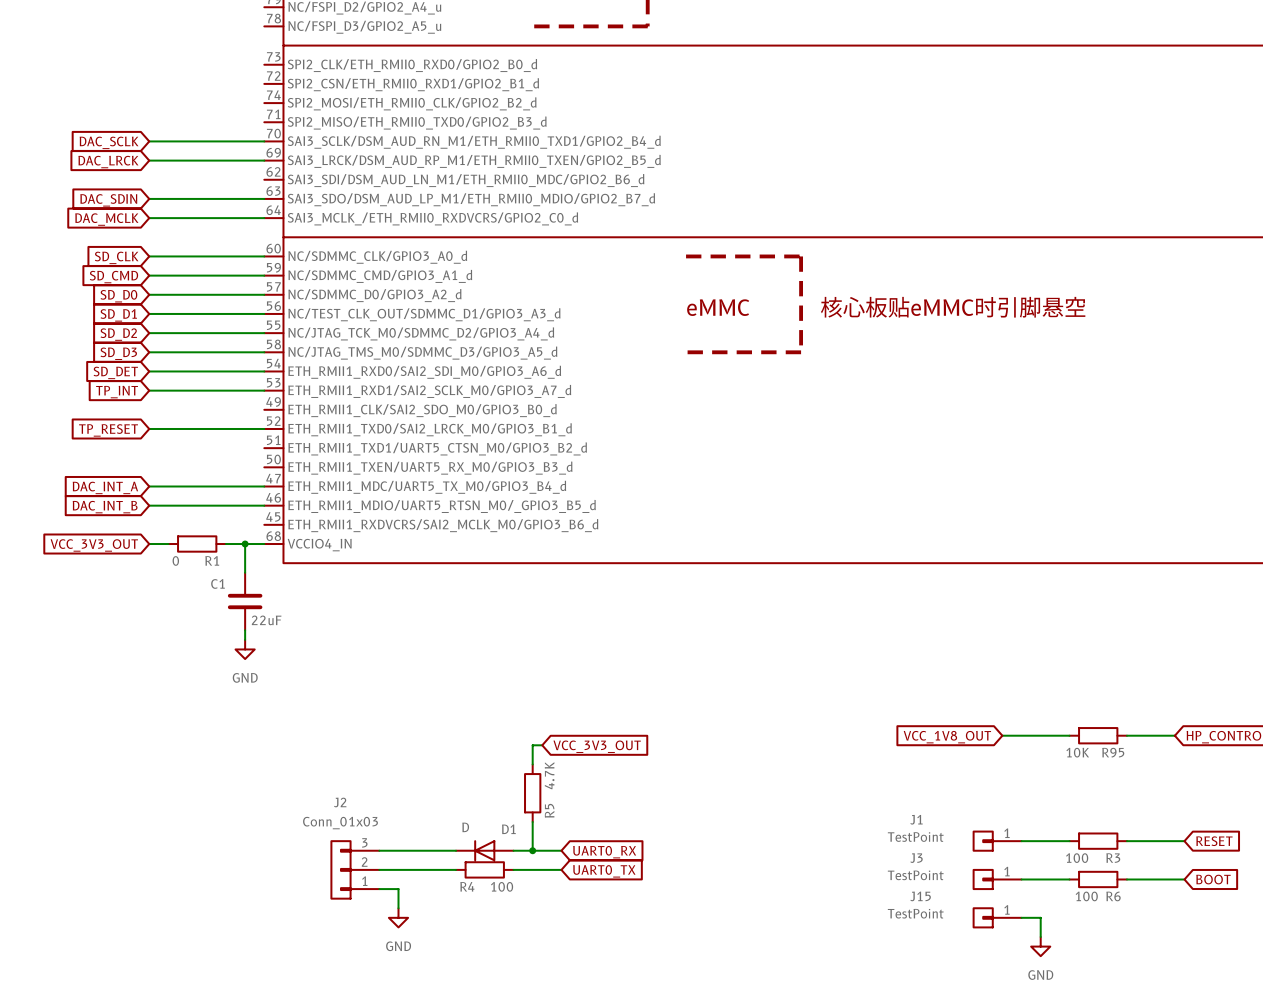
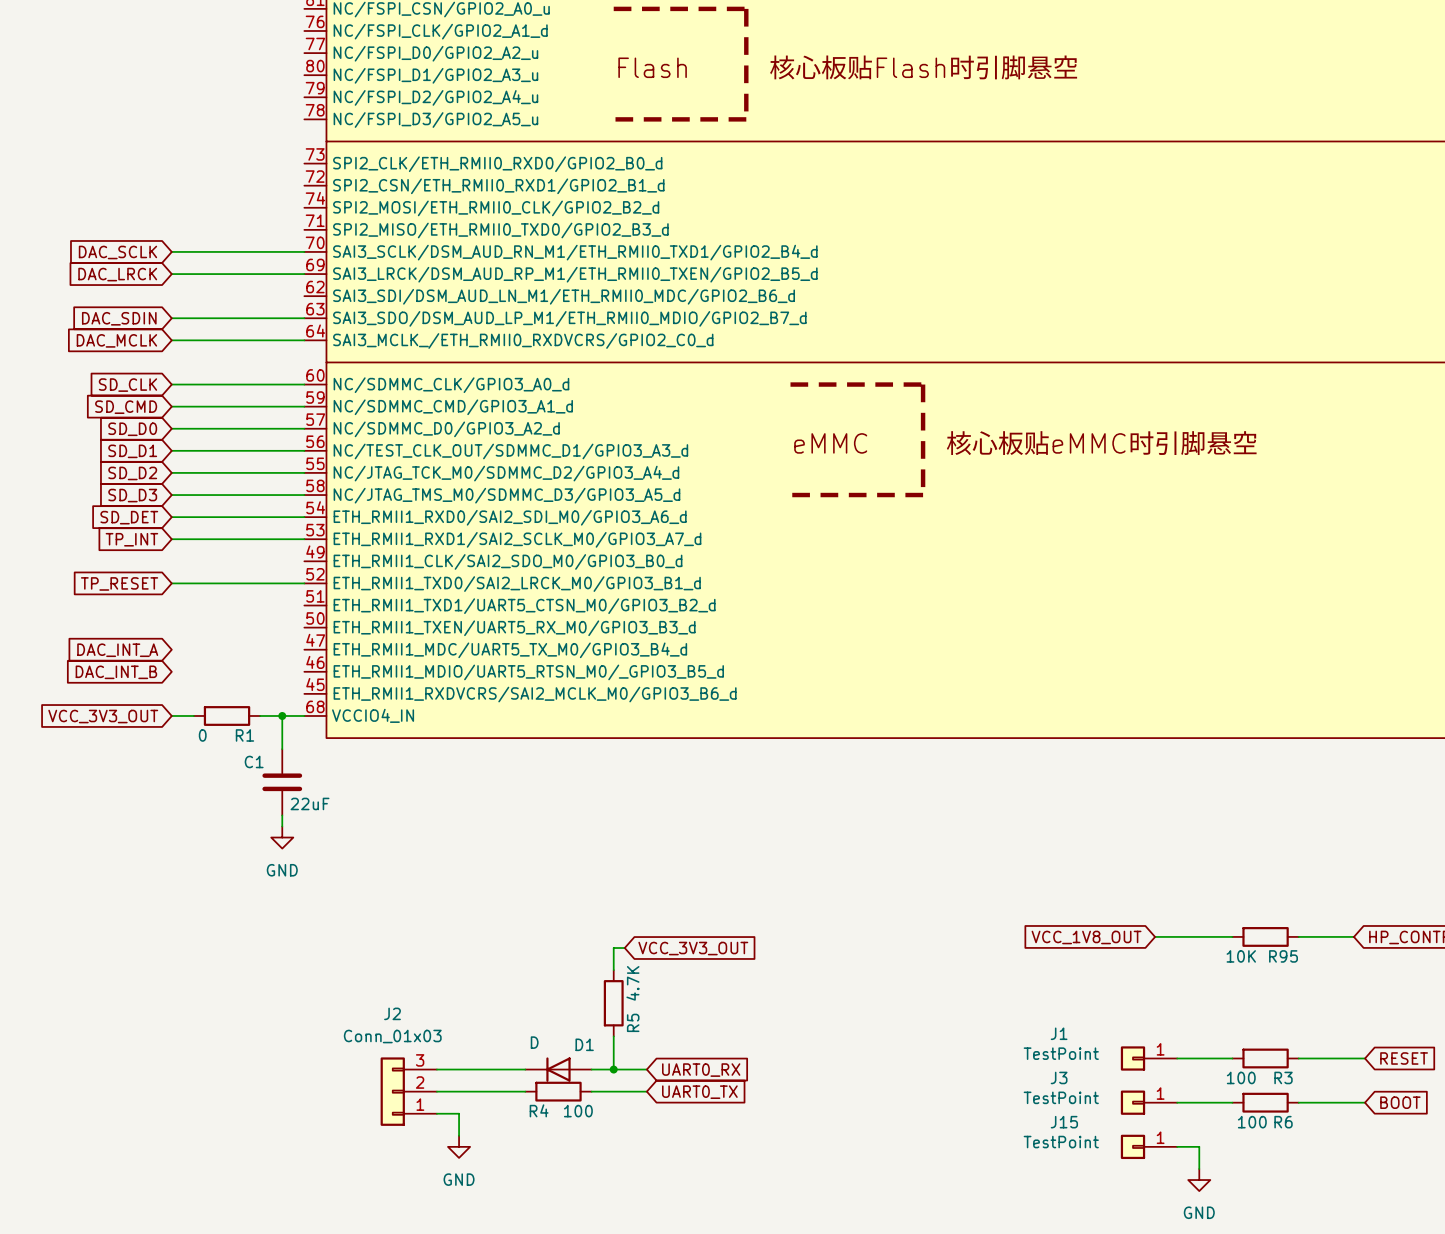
wire: (149, 486) (264, 486) -> none
wire: (149, 505) (264, 505) -> none

